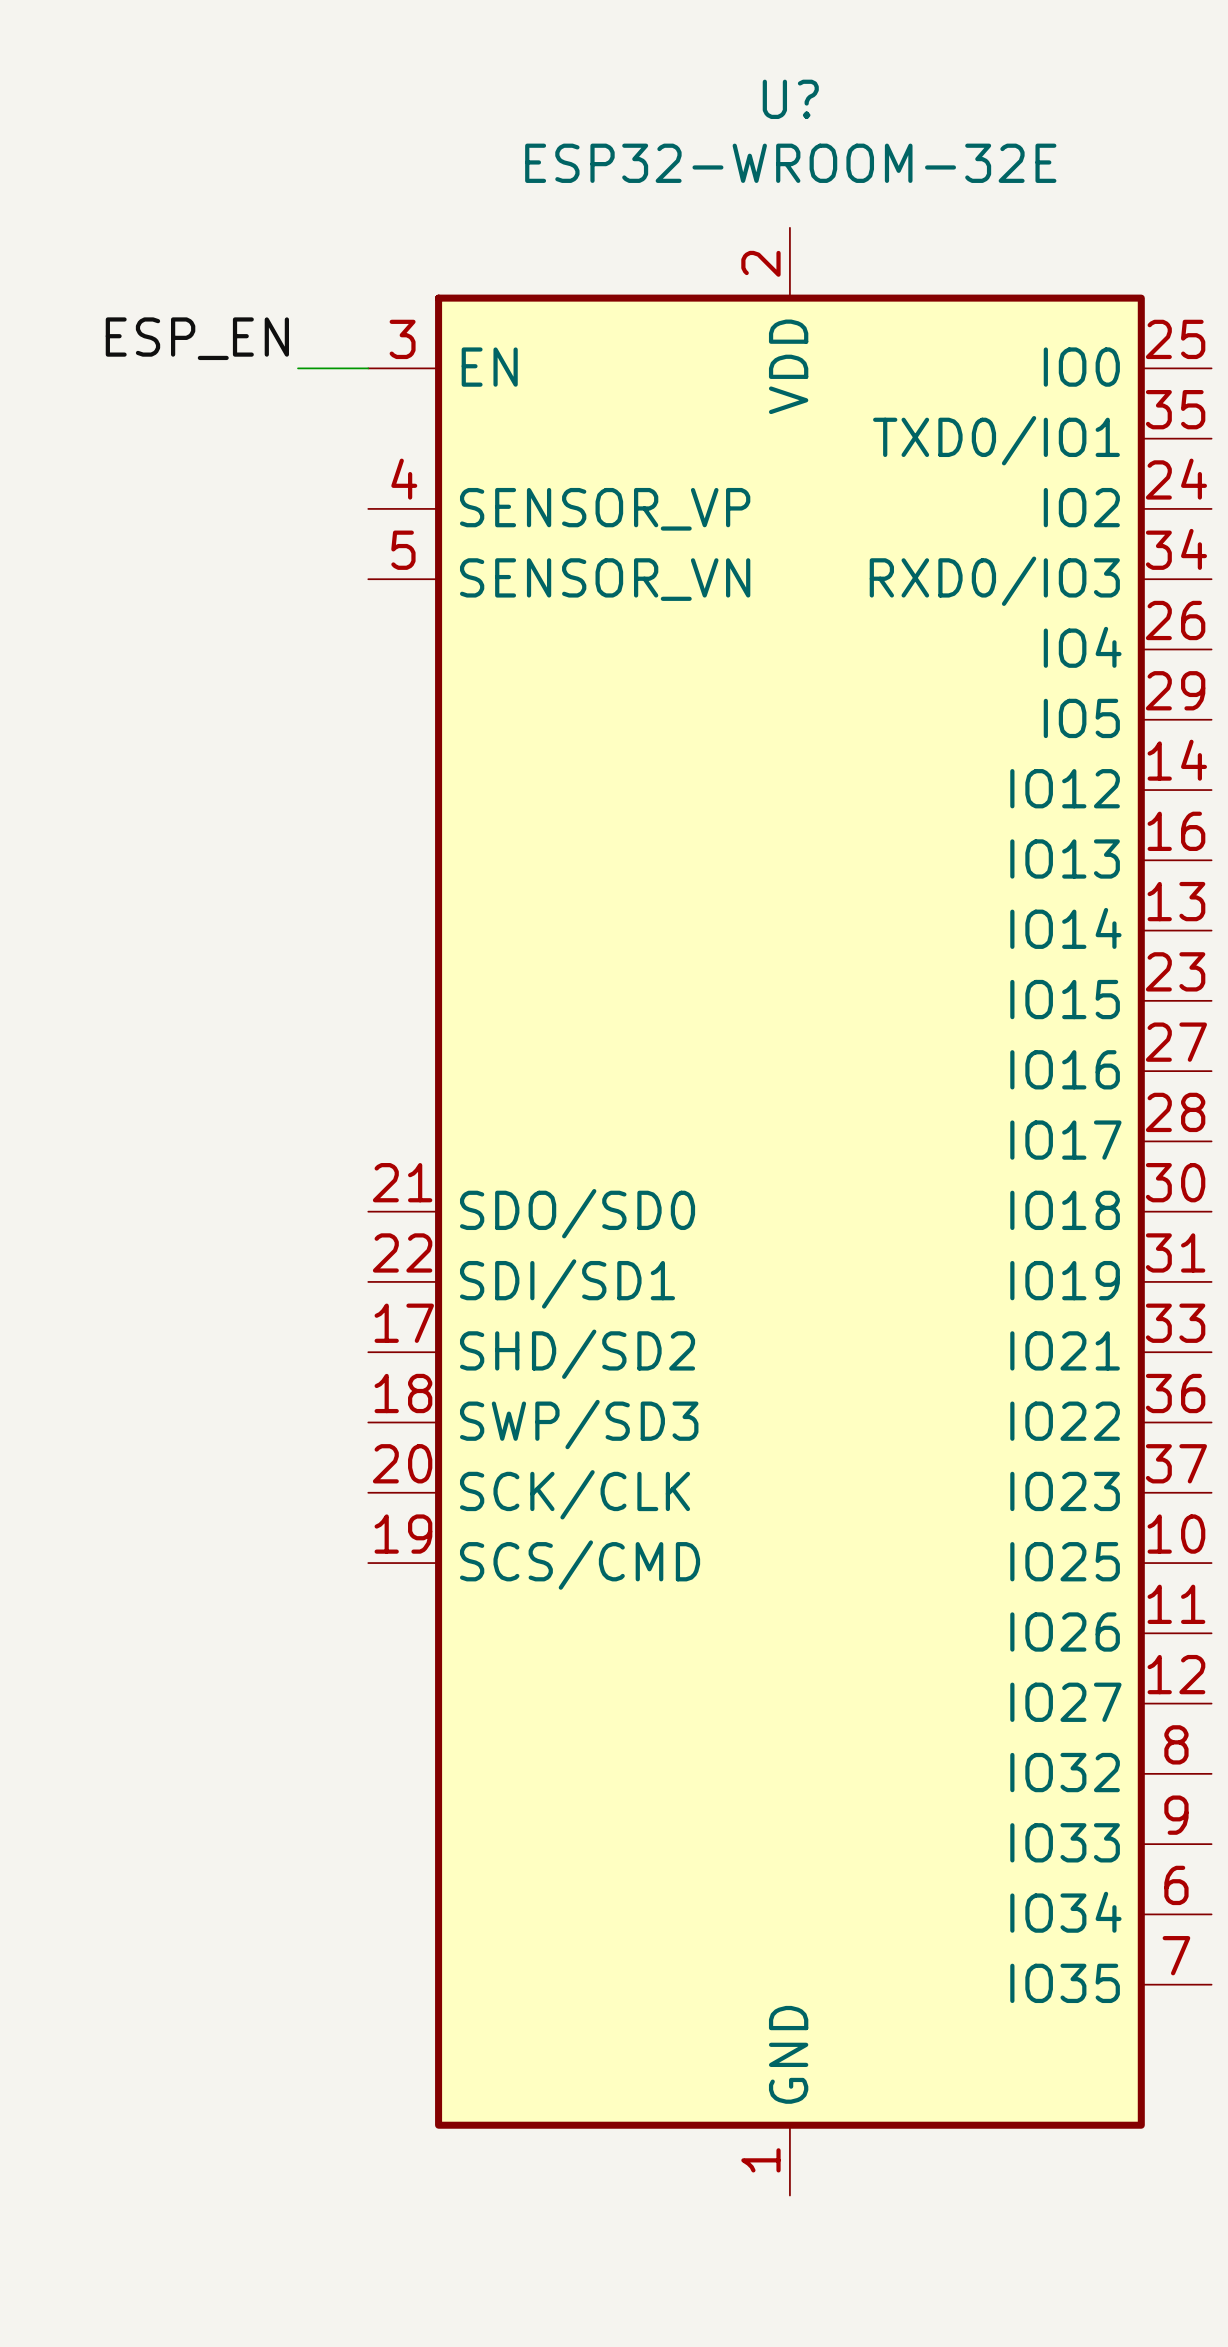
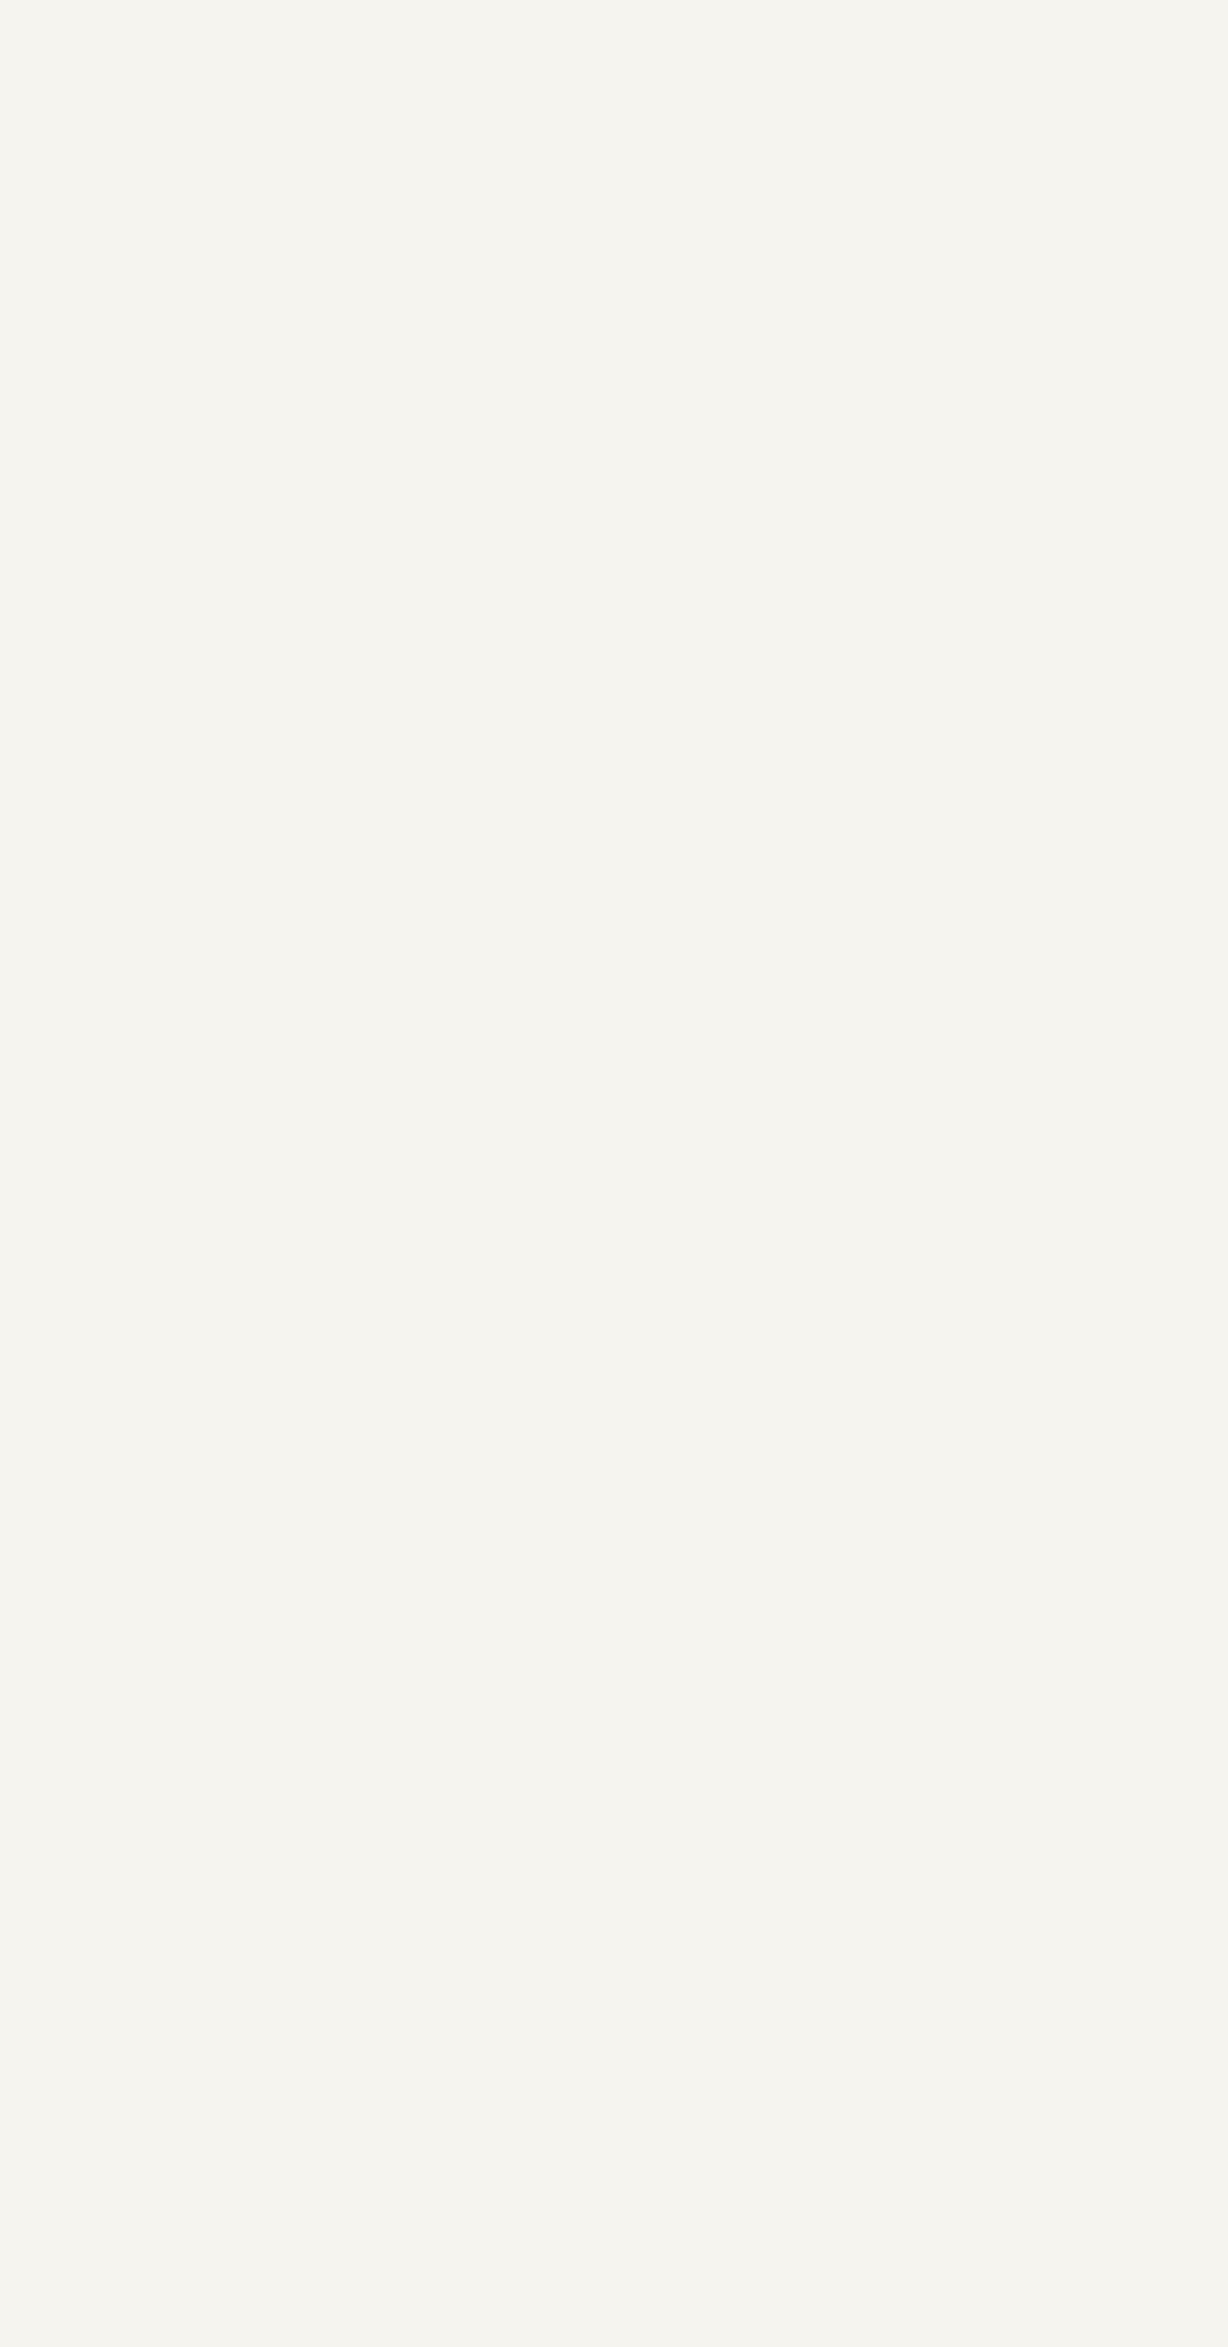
label: ESP_EN (197, 338) -> none
wire: (298, 368) (368, 368) -> none
U?: ESP32-WROOM-32E (789, 1211) -> none

